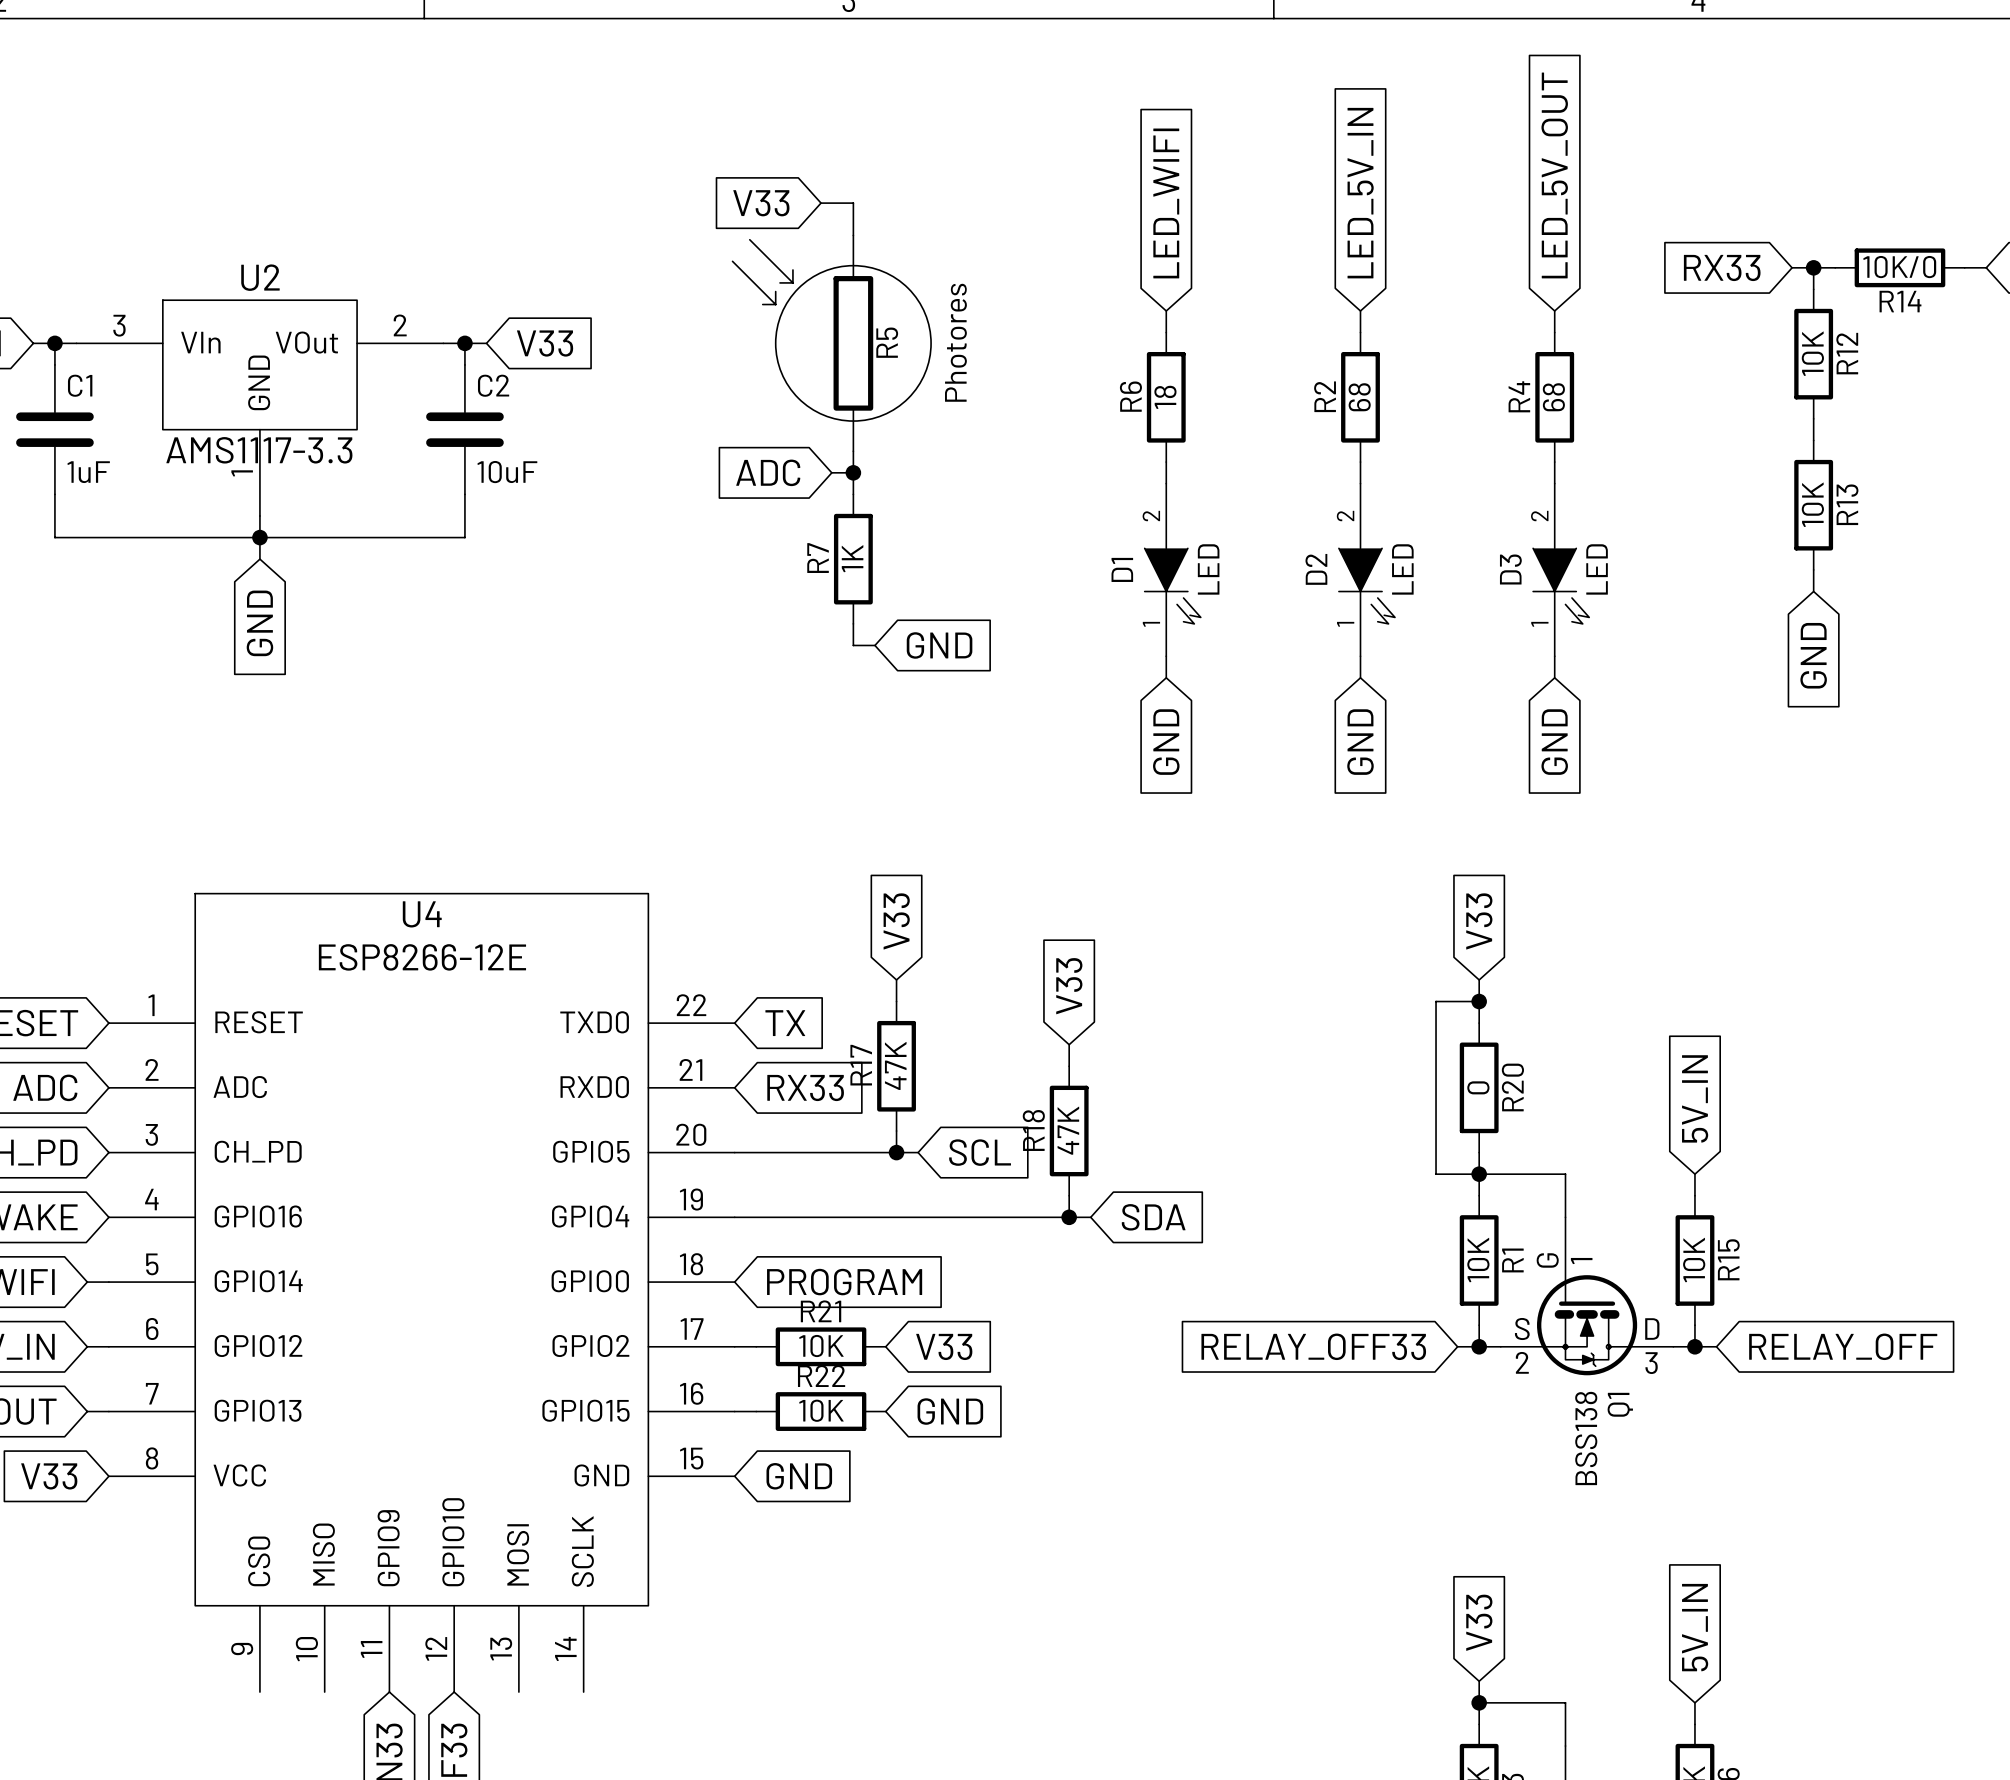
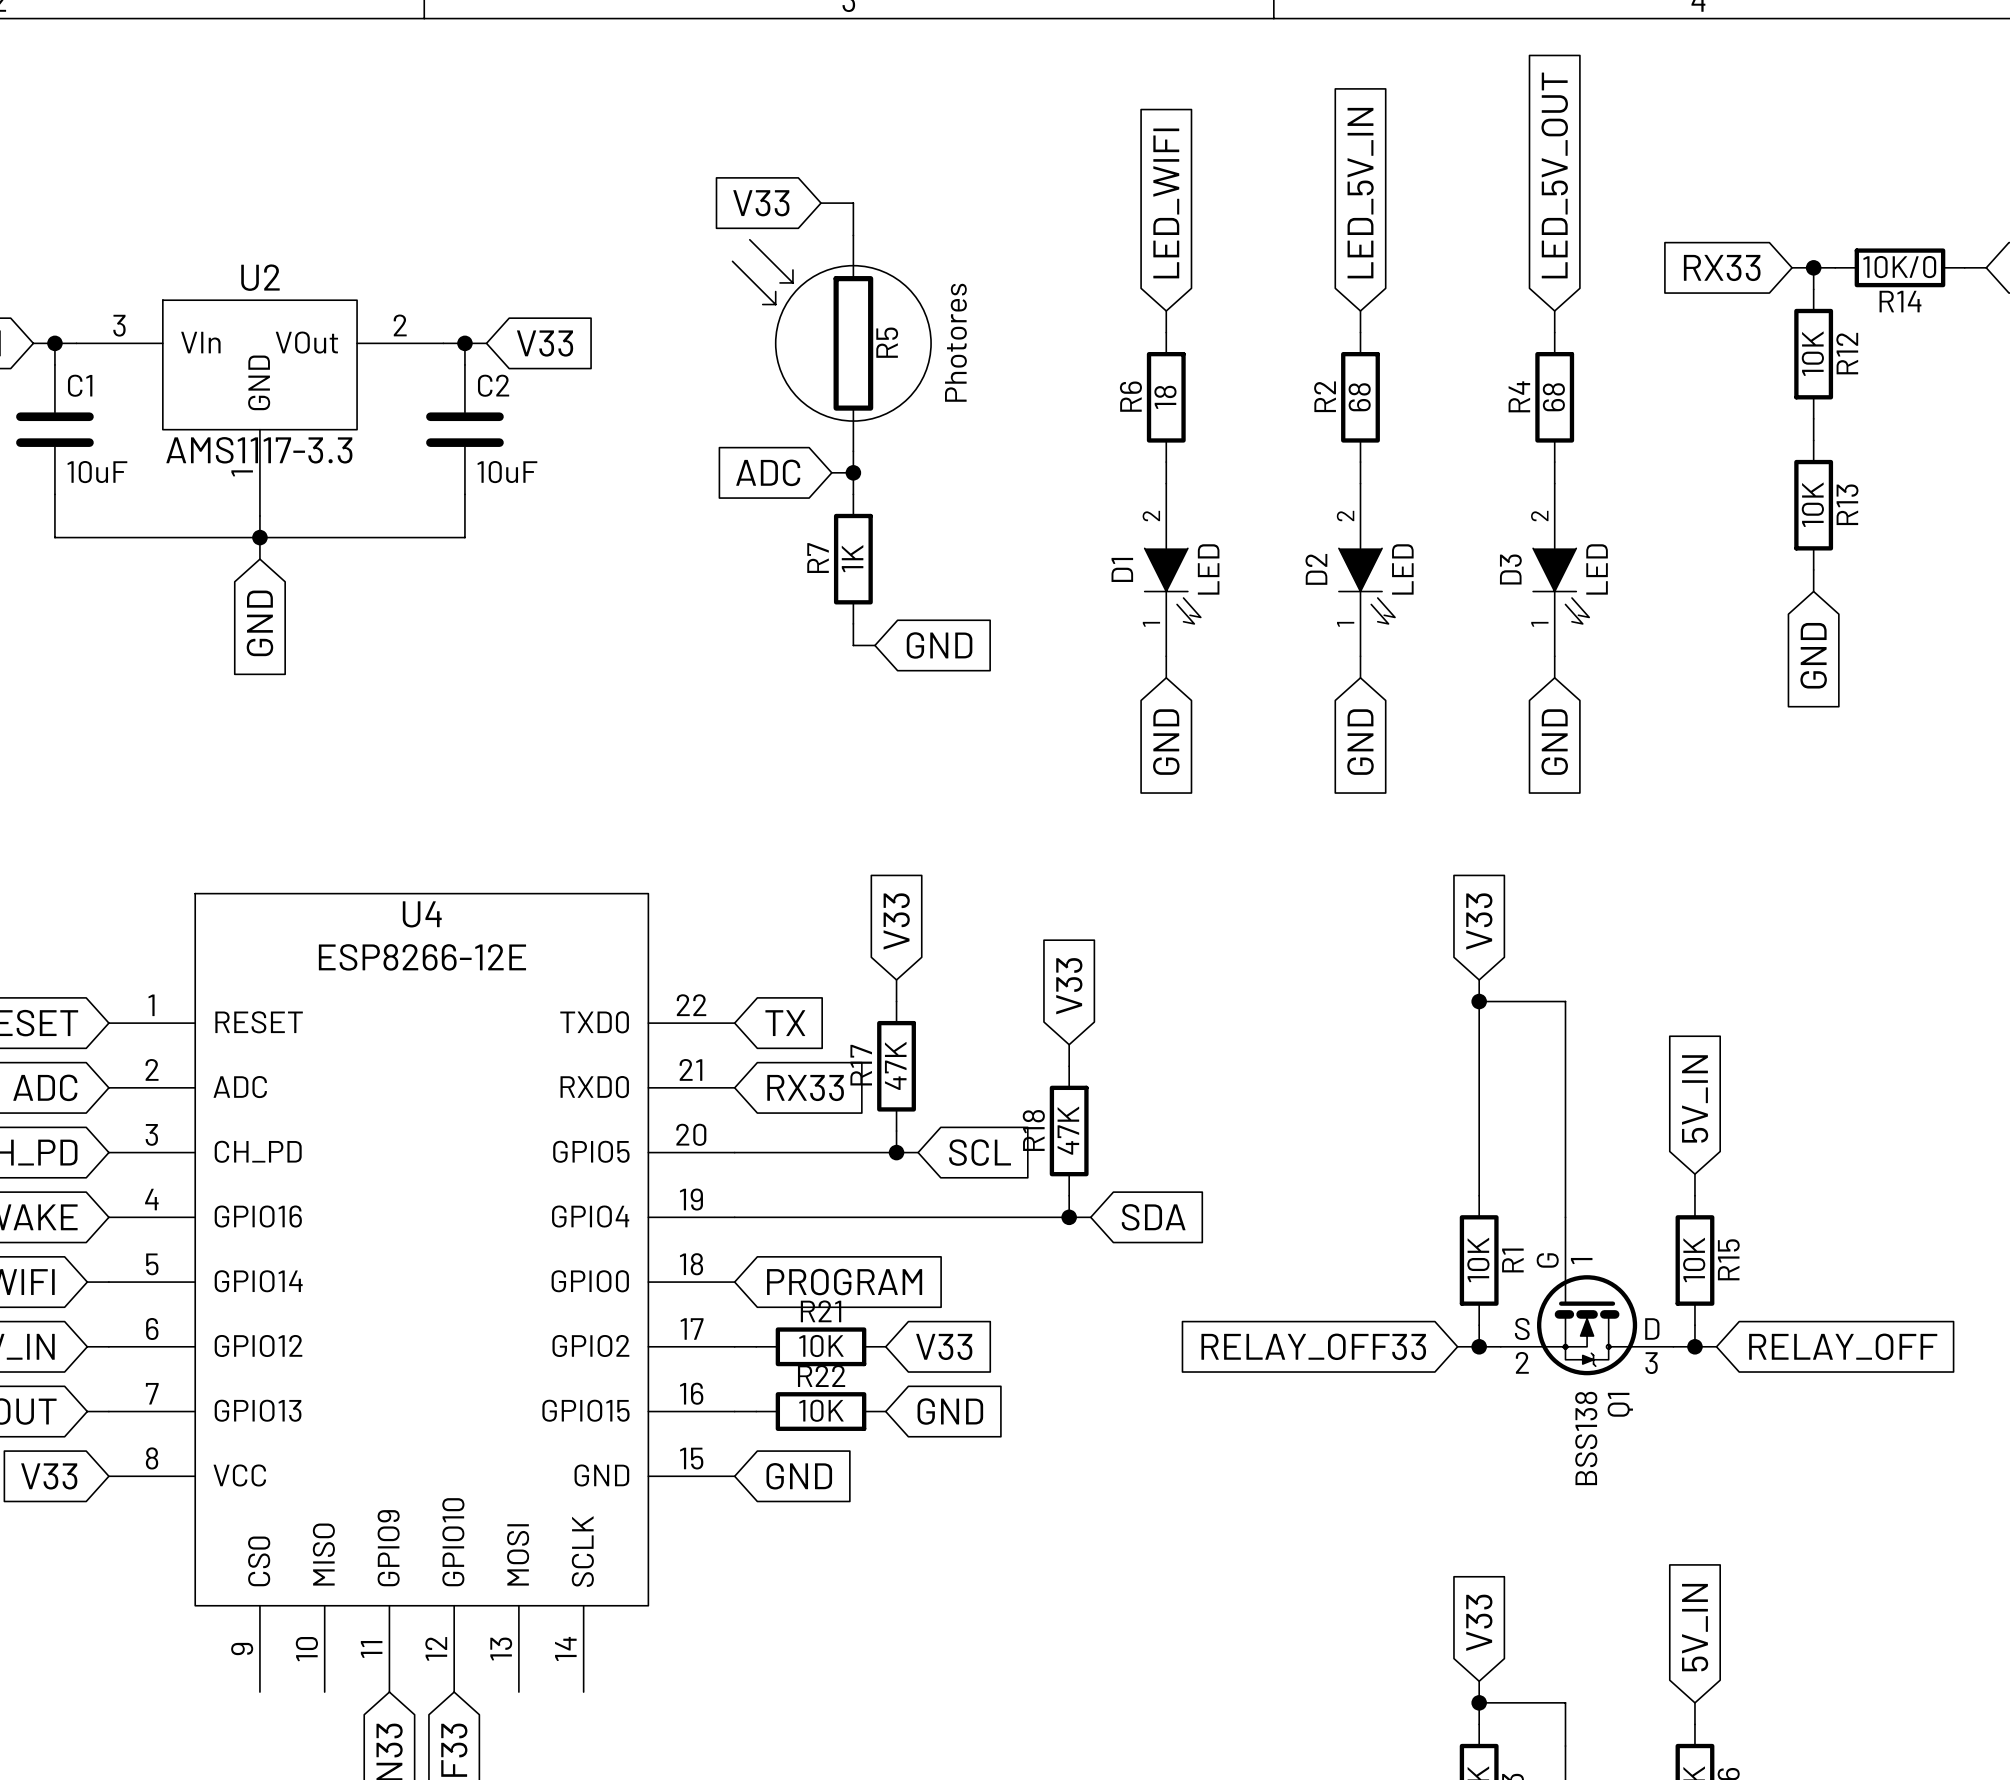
C1 value: 1uF (88, 472) -> 10uF (97, 472)
wire: (1479, 1001) (1436, 1001) (1436, 1174) (1565, 1174) -> (1479, 1001) (1565, 1001) (1565, 1174)
wire: none -> (1479, 1023) (1479, 1152)
R20: 0 (1479, 1087) -> none
junction: (1479, 1174) -> none

